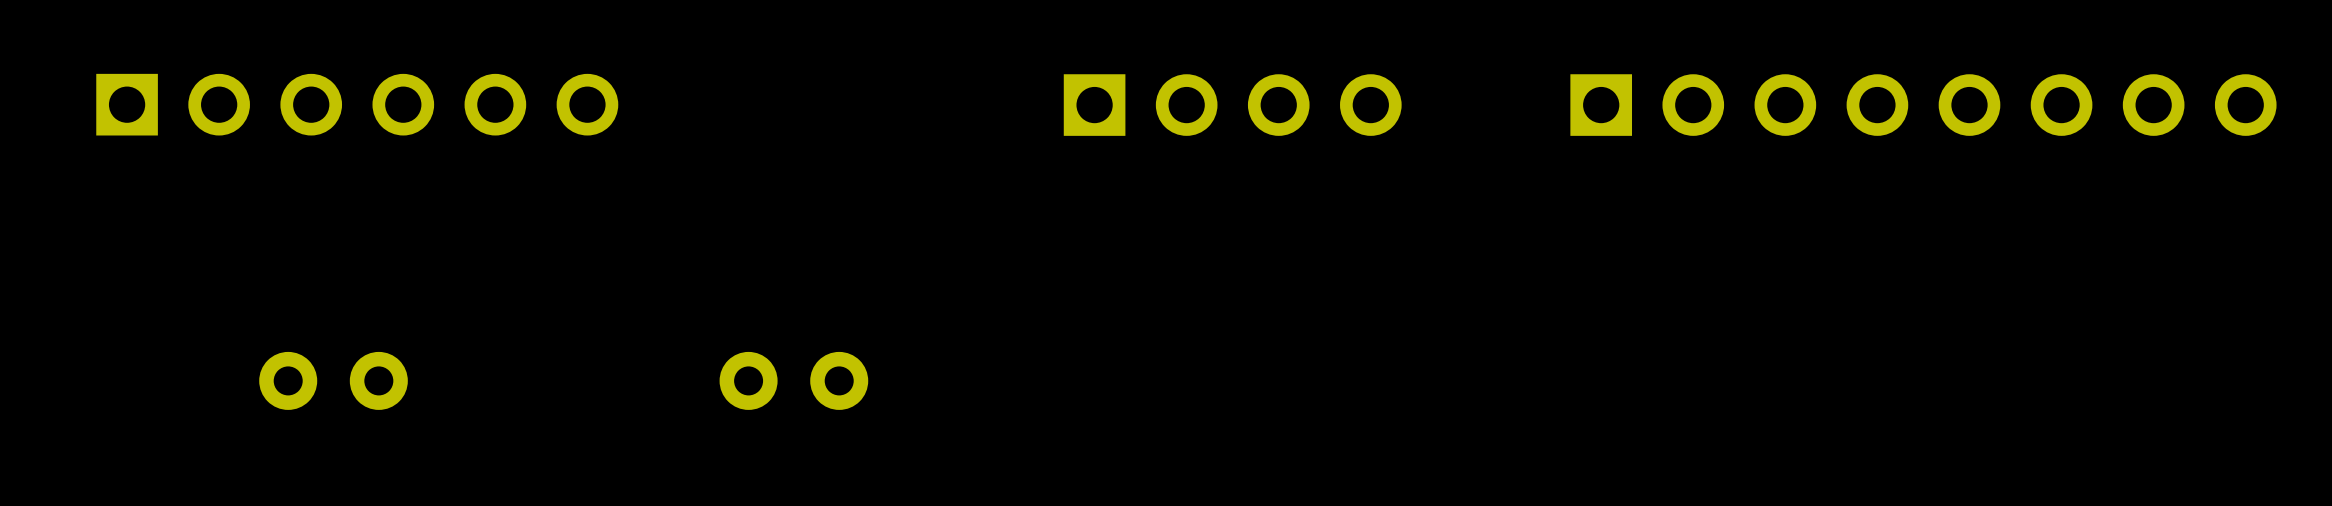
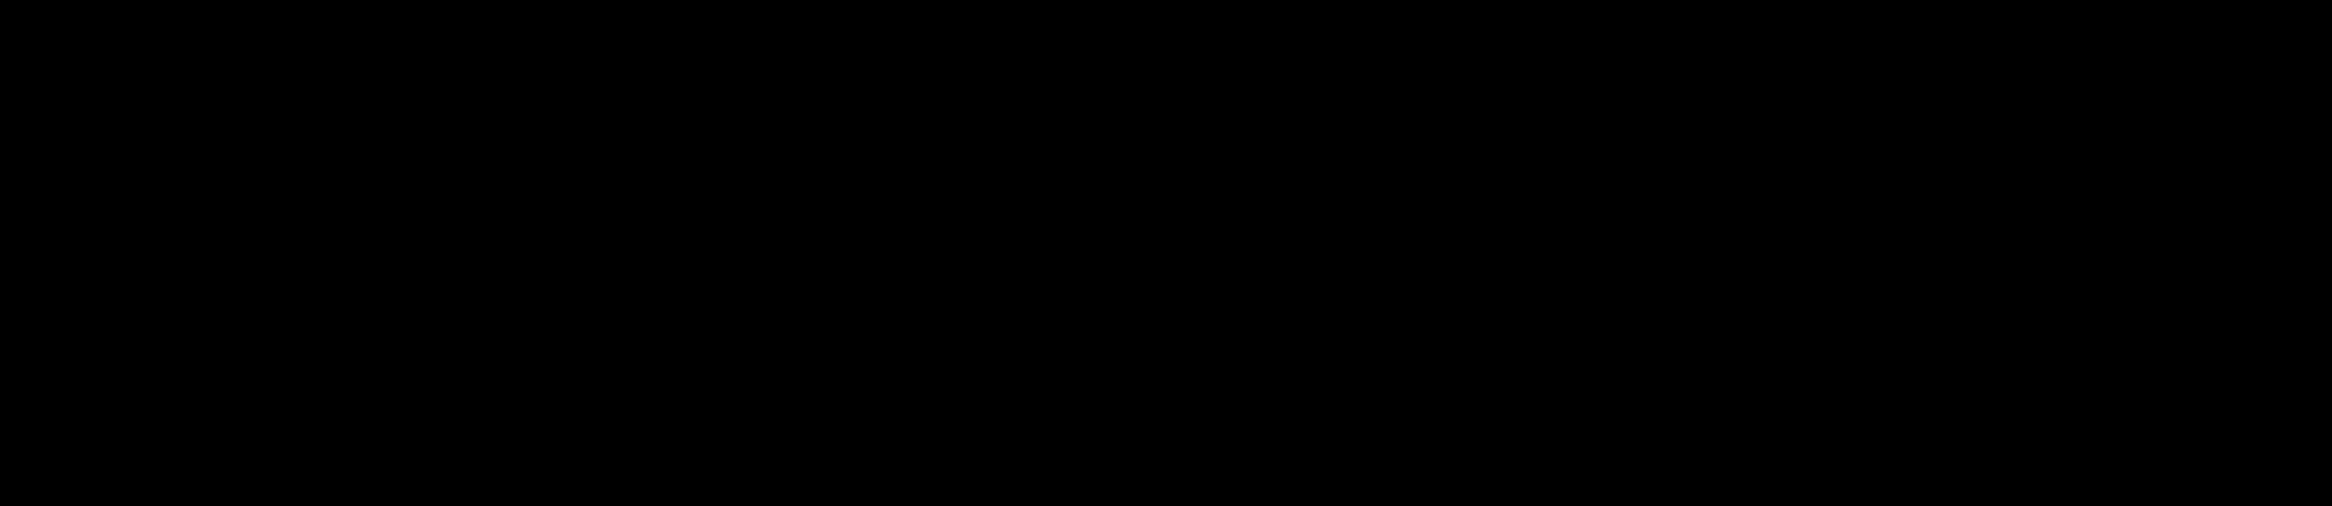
part: (357, 104) -> none
part: (1232, 105) -> none
part: (1923, 105) -> none
part: (333, 380) -> none
part: (793, 380) -> none

